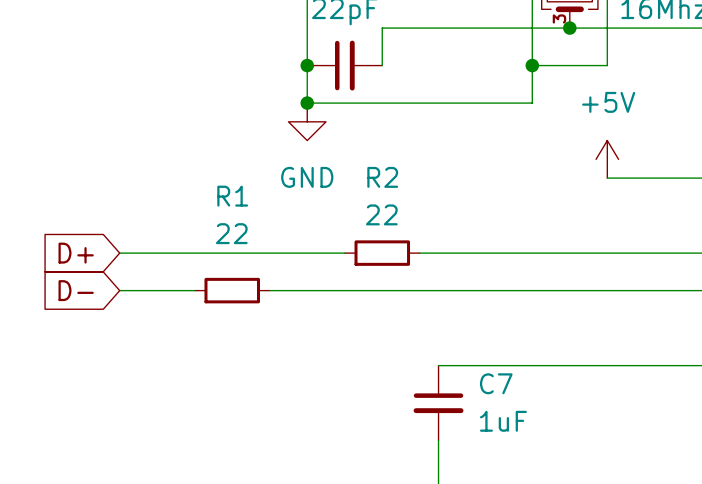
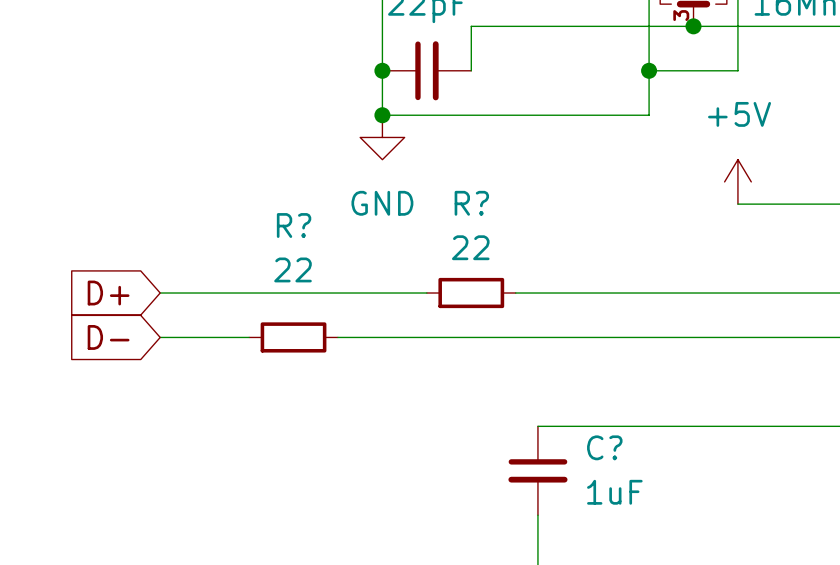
R2 name: R2 (382, 177) -> R? (471, 203)
R1 name: R1 (232, 196) -> R? (294, 225)
C7 name: C7 (496, 383) -> C? (604, 447)

